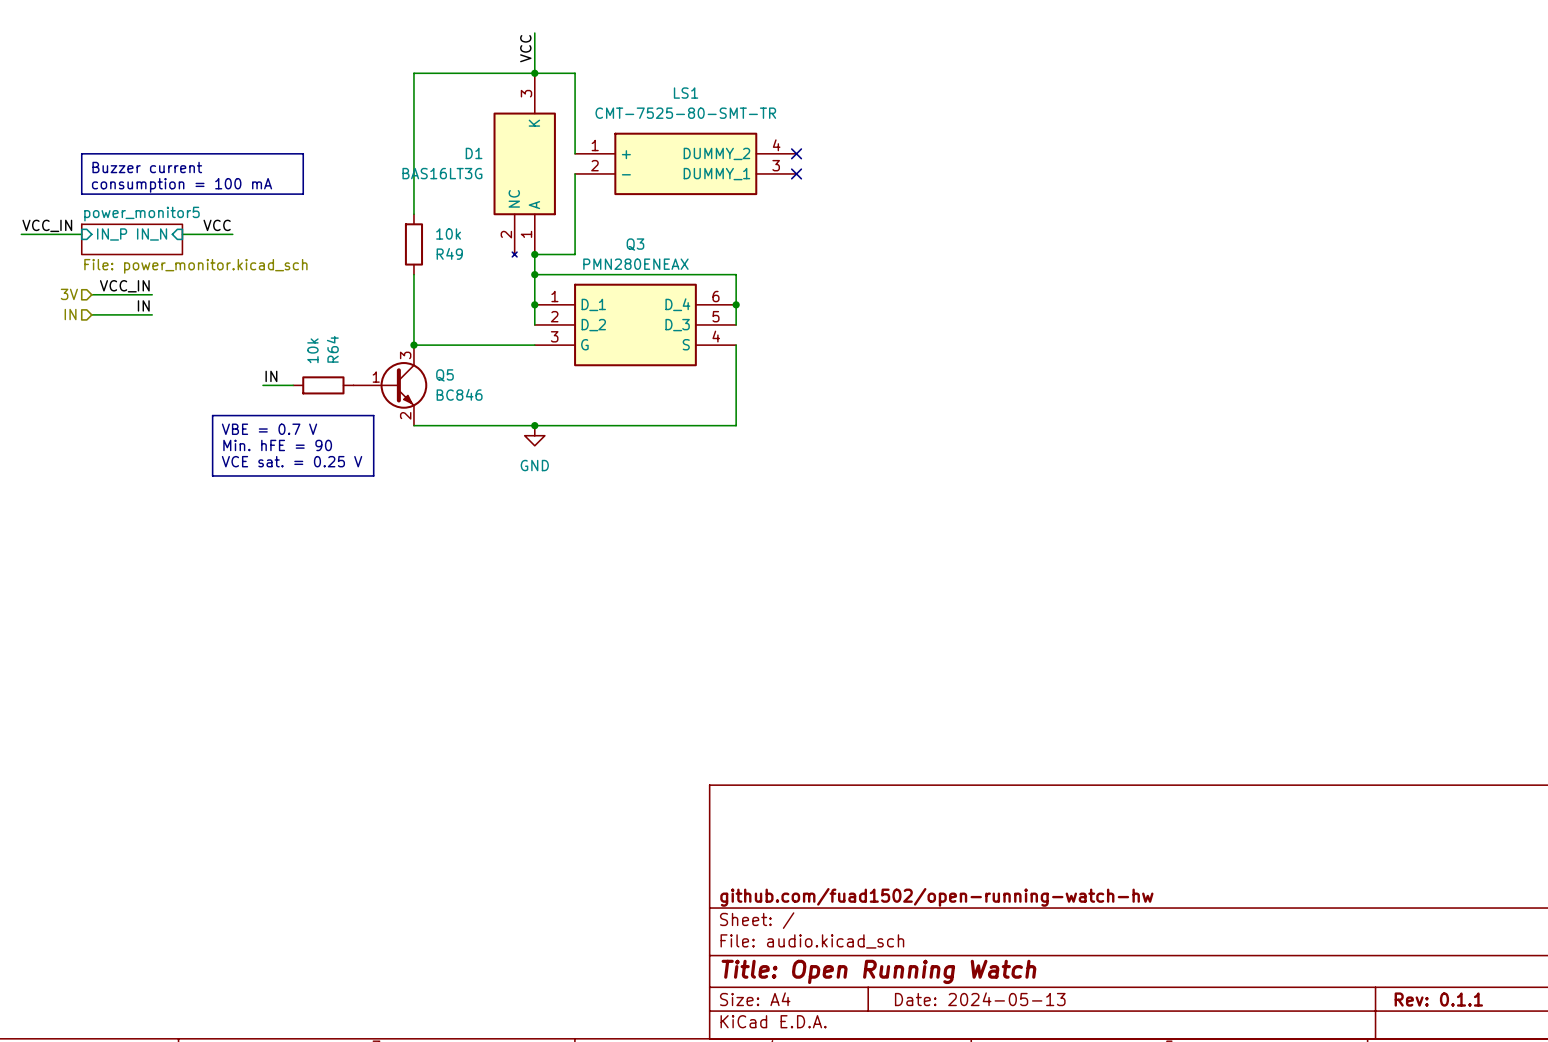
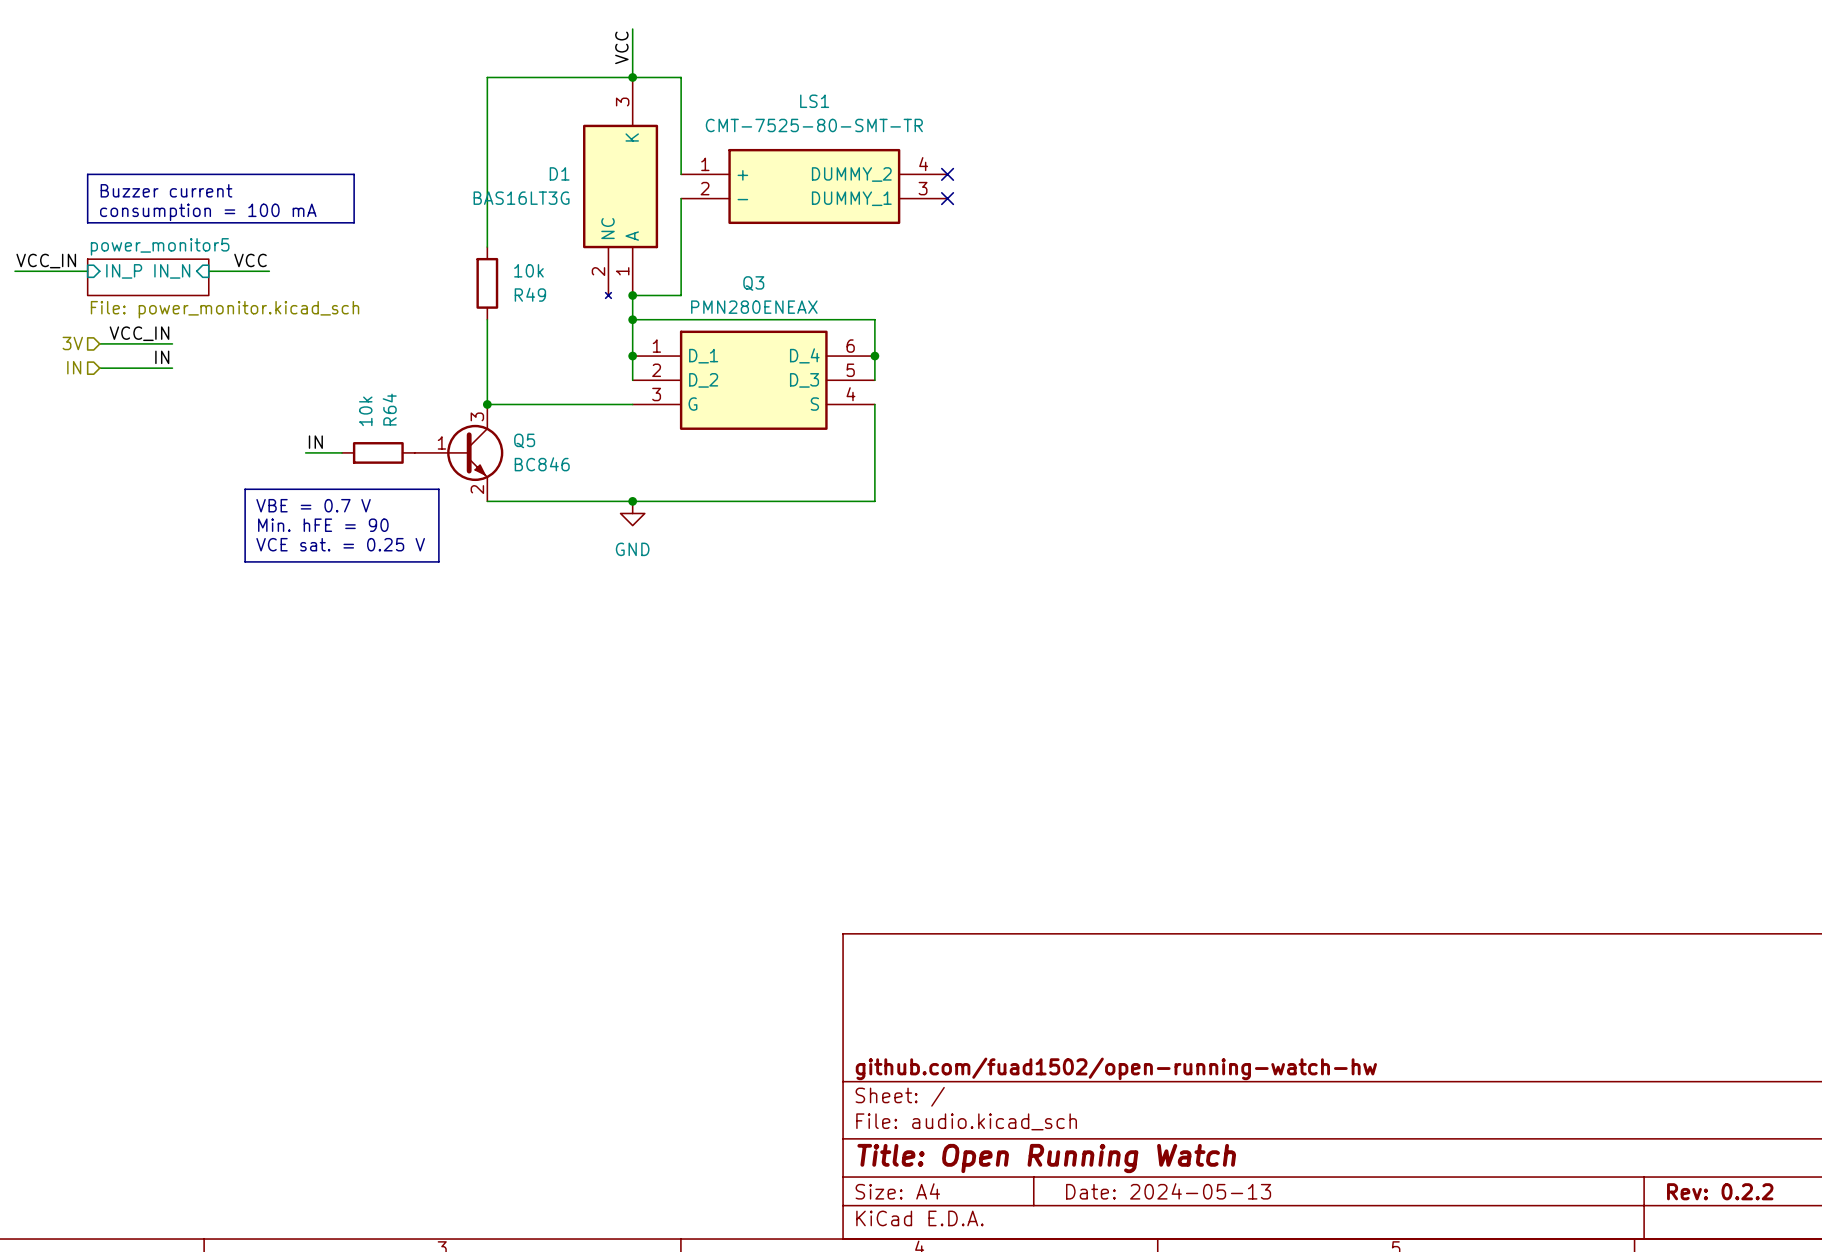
title block: Rev: 0.1.1 (1438, 999) -> Rev: 0.2.2 (1720, 1191)

